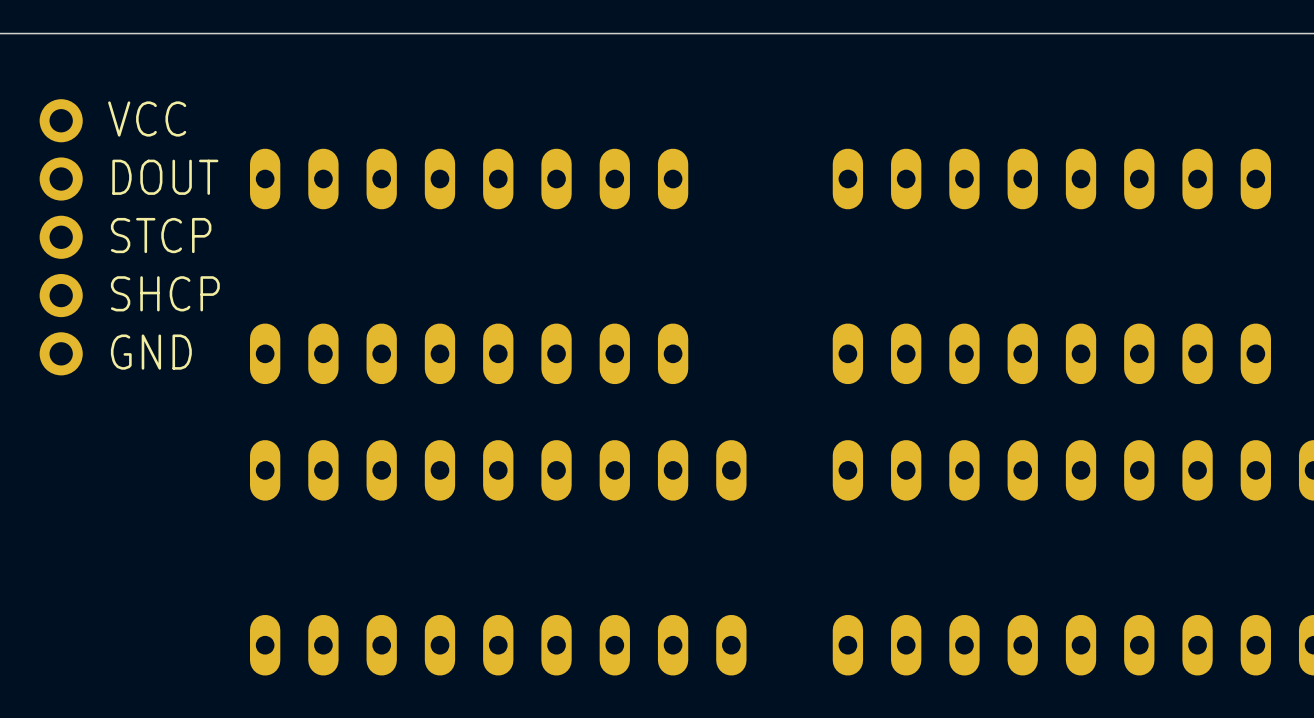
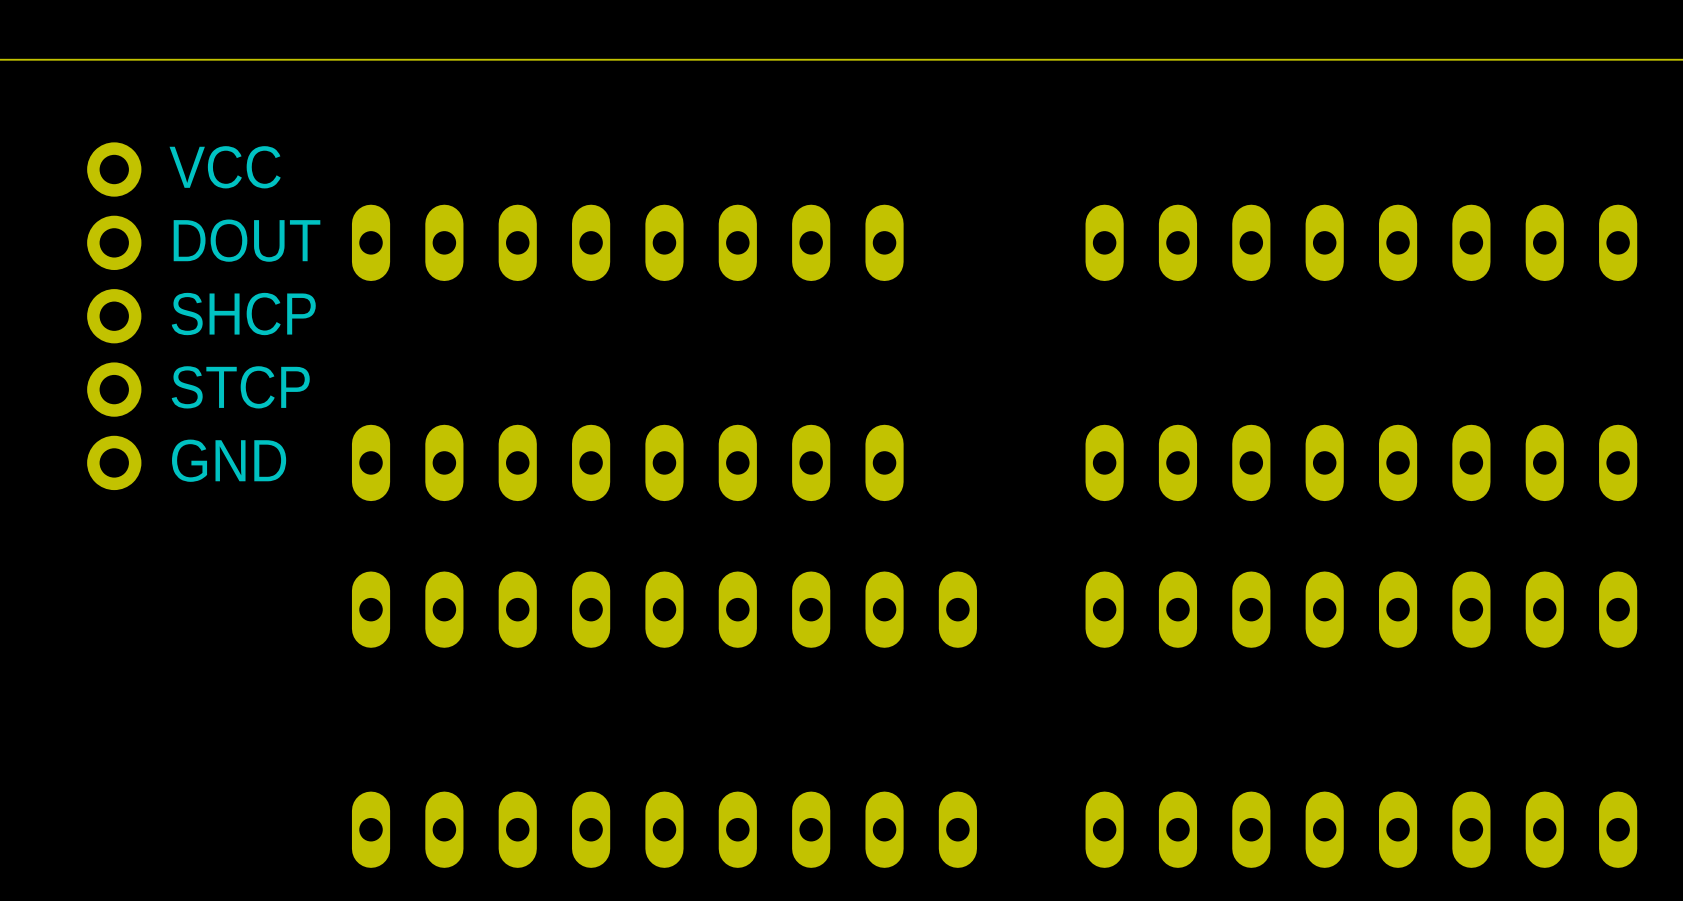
text: STCP (161, 235) -> SHCP (243, 314)
text: SHCP (165, 293) -> STCP (240, 387)

